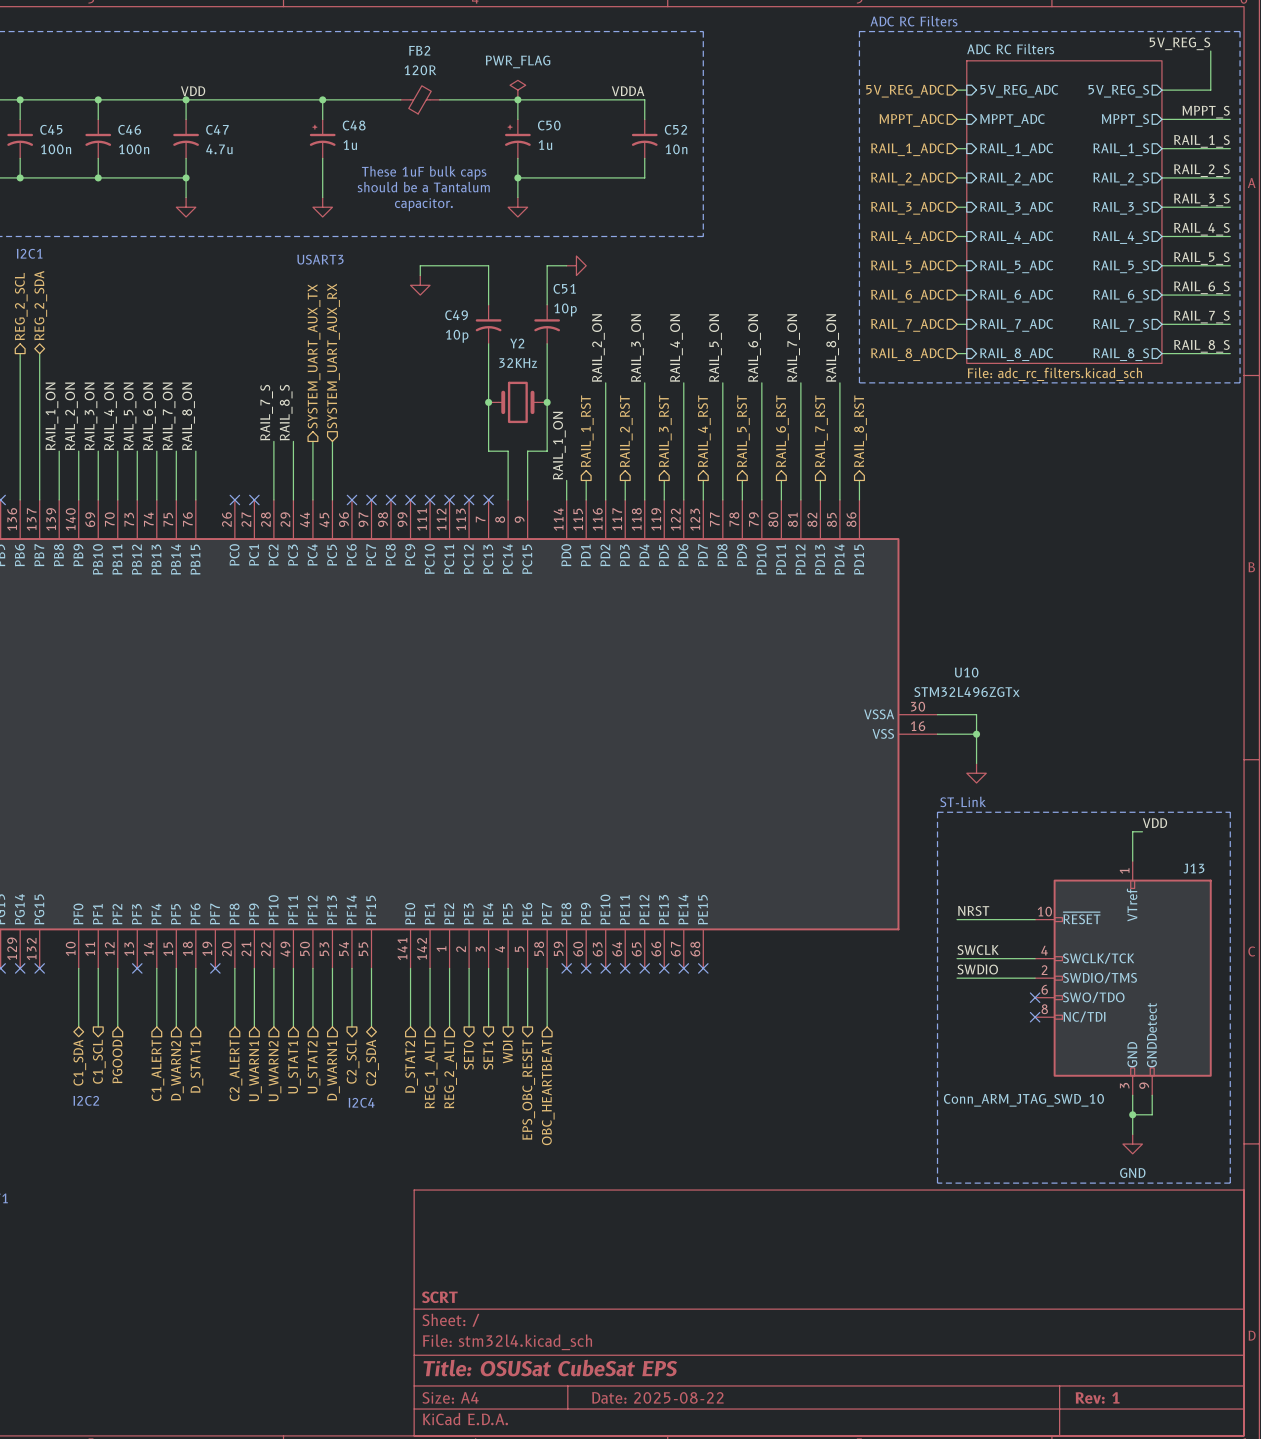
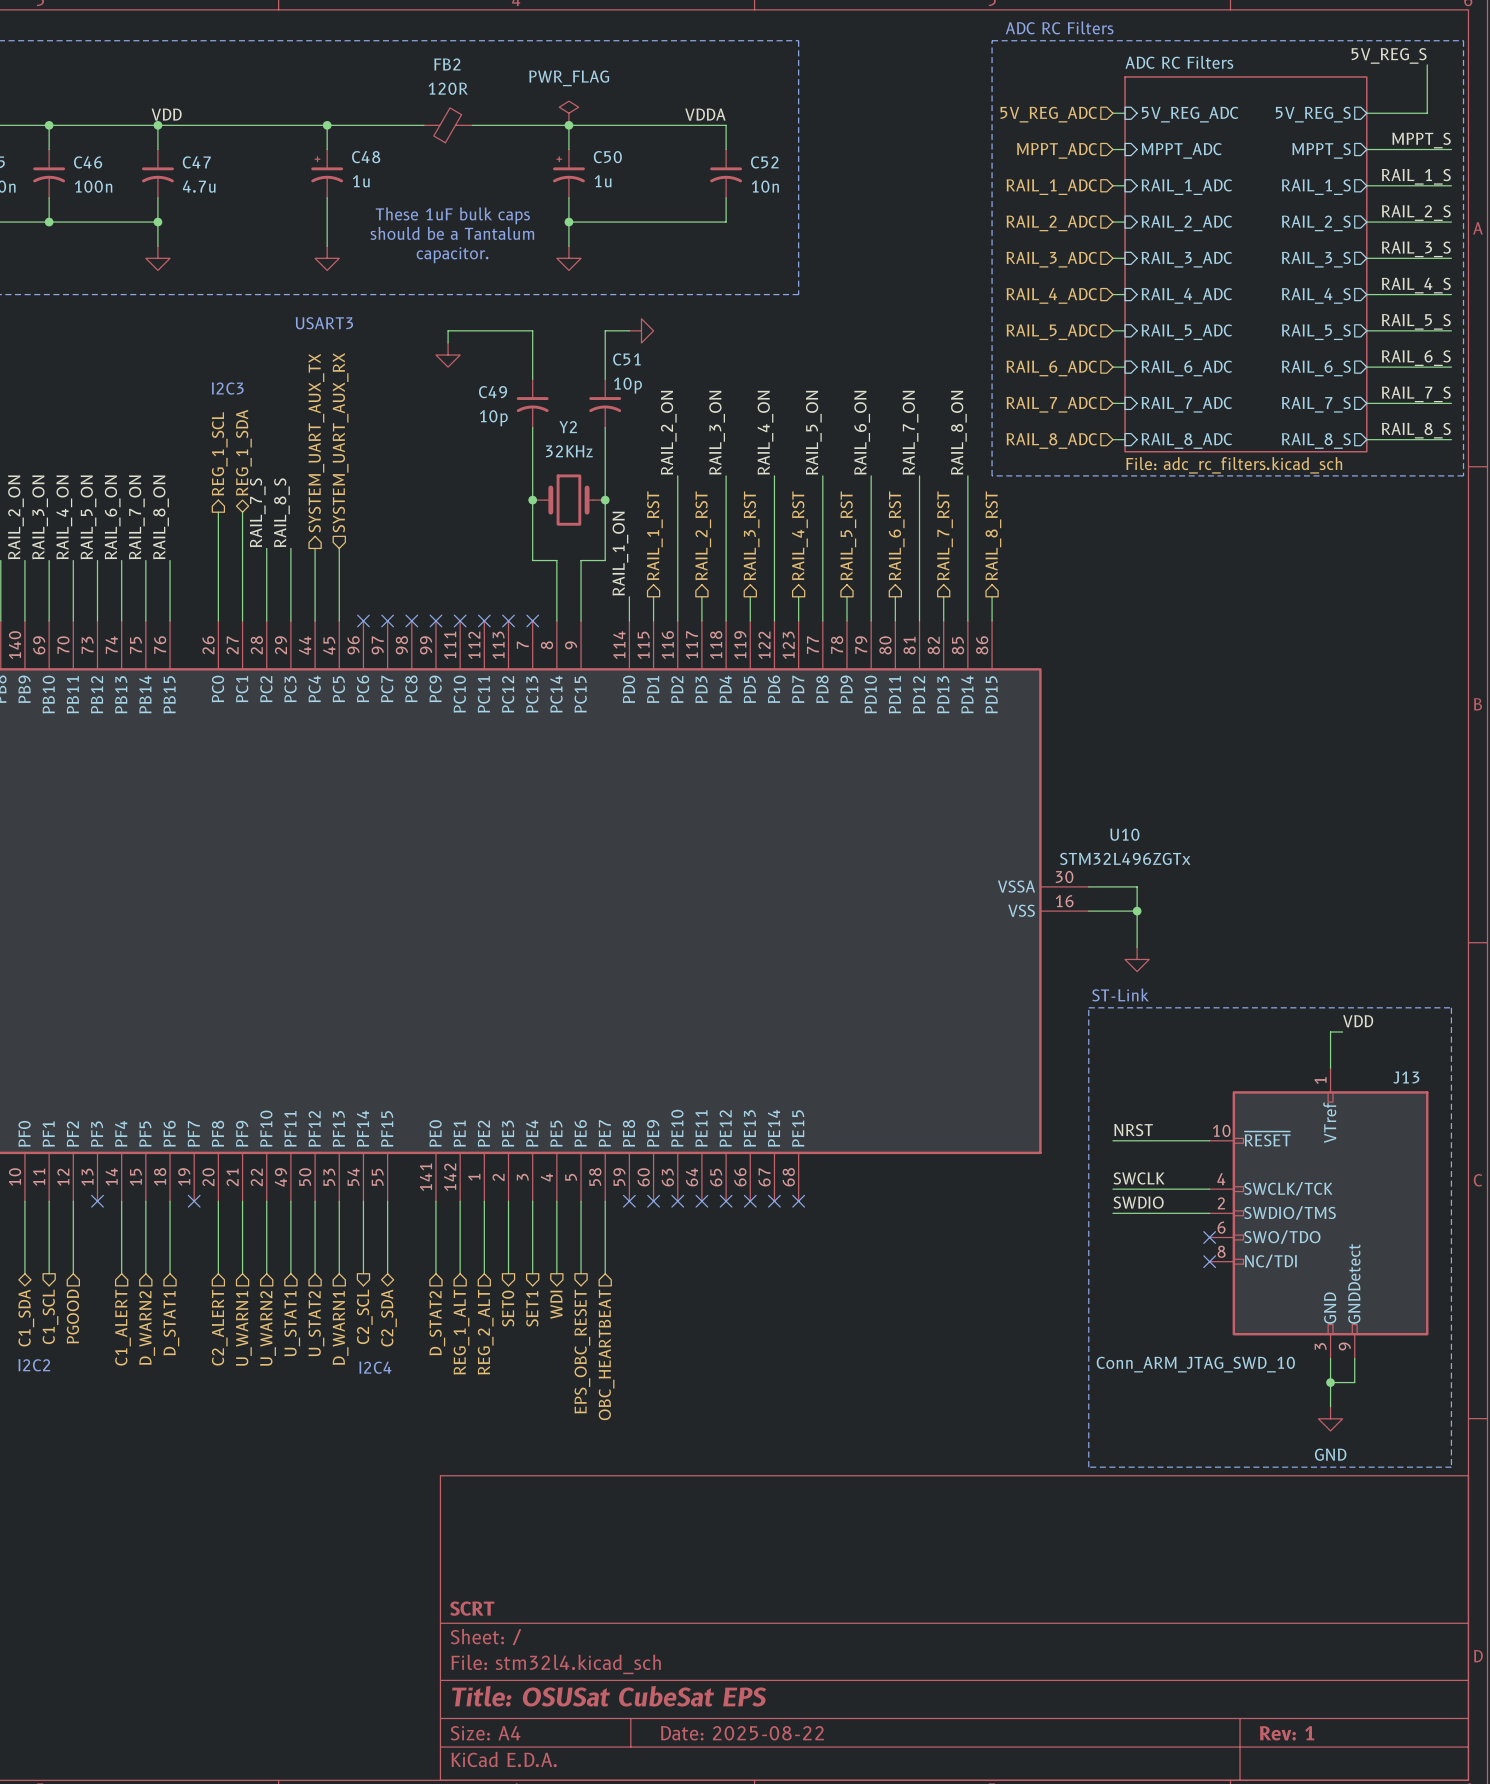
text: none -> I2C3 (227, 388)
hierarchical label: none -> REG_1_SDA (243, 452)
hierarchical label: none -> REG_1_SCL (219, 453)
wire: none -> (218, 512) (218, 620)
wire: none -> (242, 512) (242, 620)
no-connect mark: (234, 499) -> none
no-connect mark: (254, 499) -> none

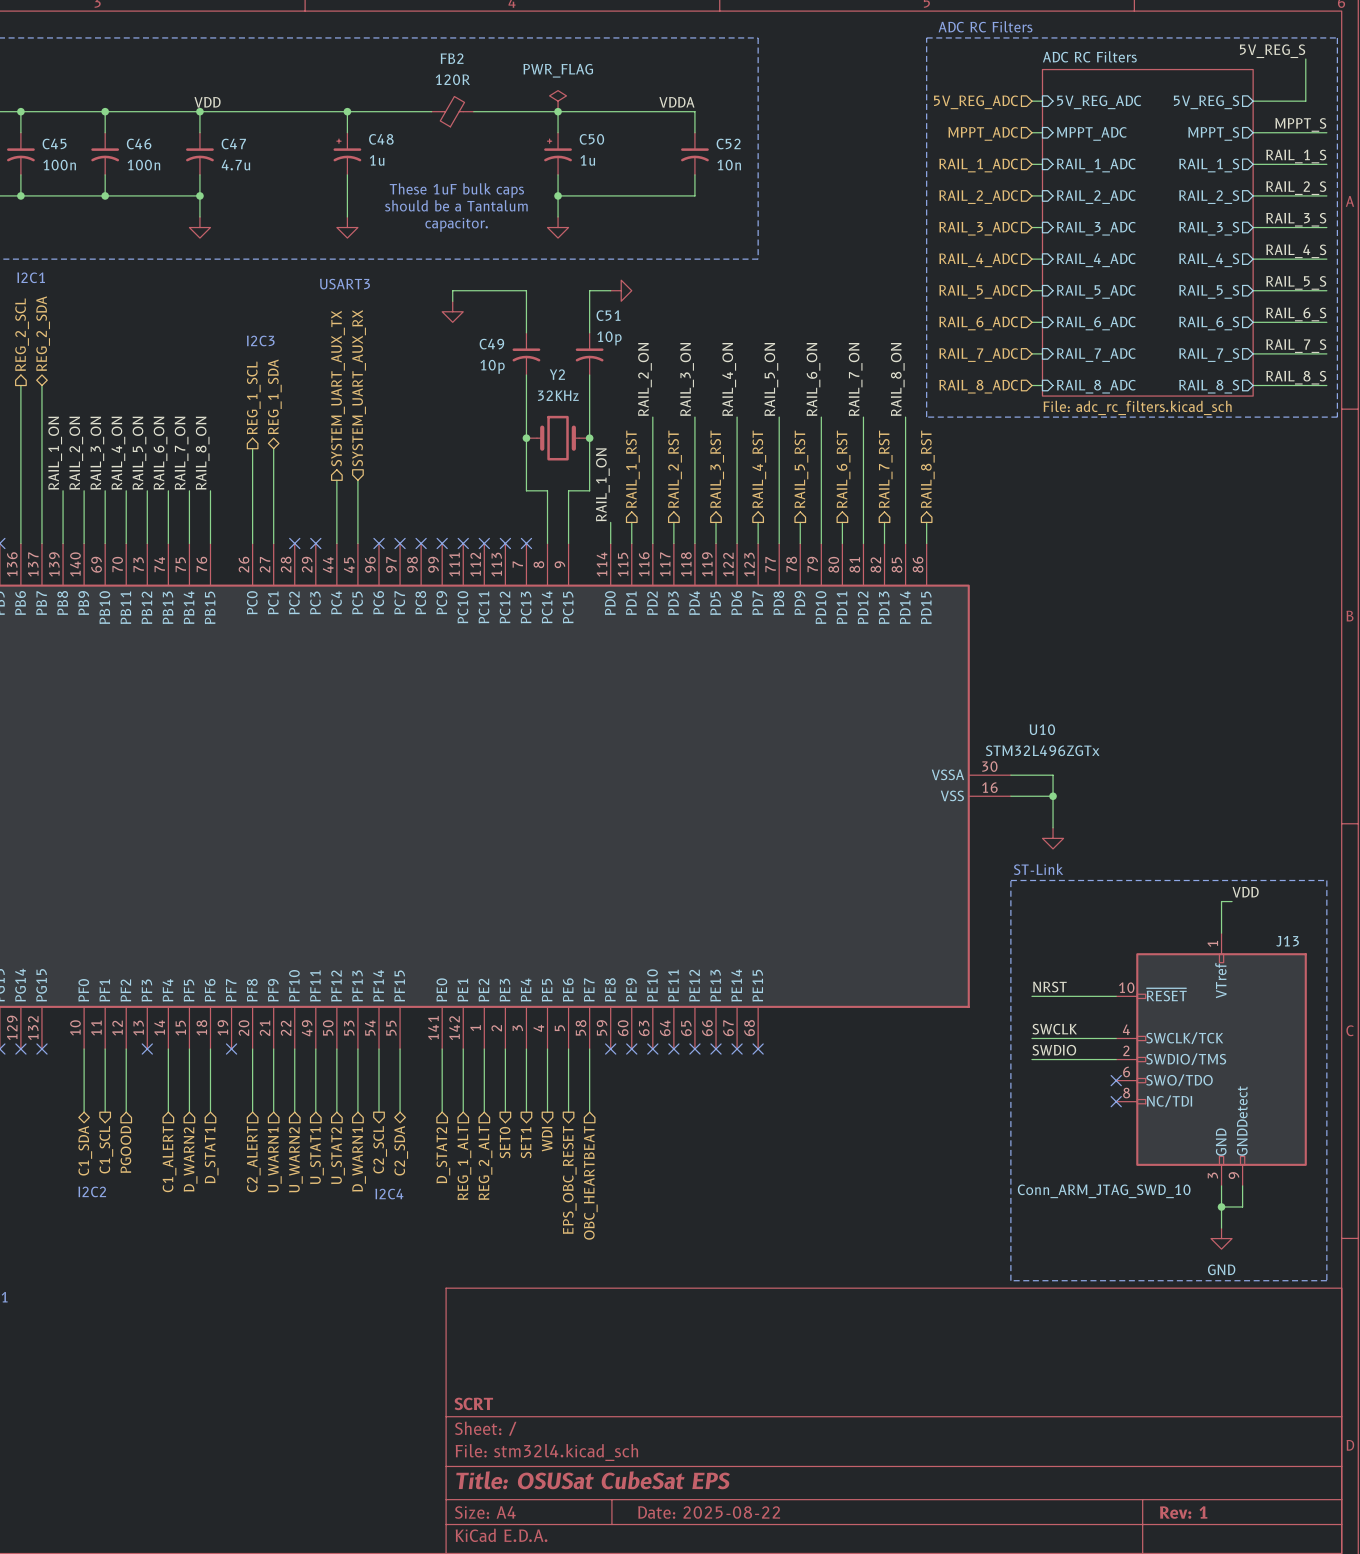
label: RAIL_7_S (257, 512) -> none
label: RAIL_8_S (281, 512) -> none
wire: (266, 548) (266, 620) -> none
wire: (290, 548) (290, 620) -> none
no-connect mark: none -> (294, 543)
no-connect mark: none -> (315, 543)

